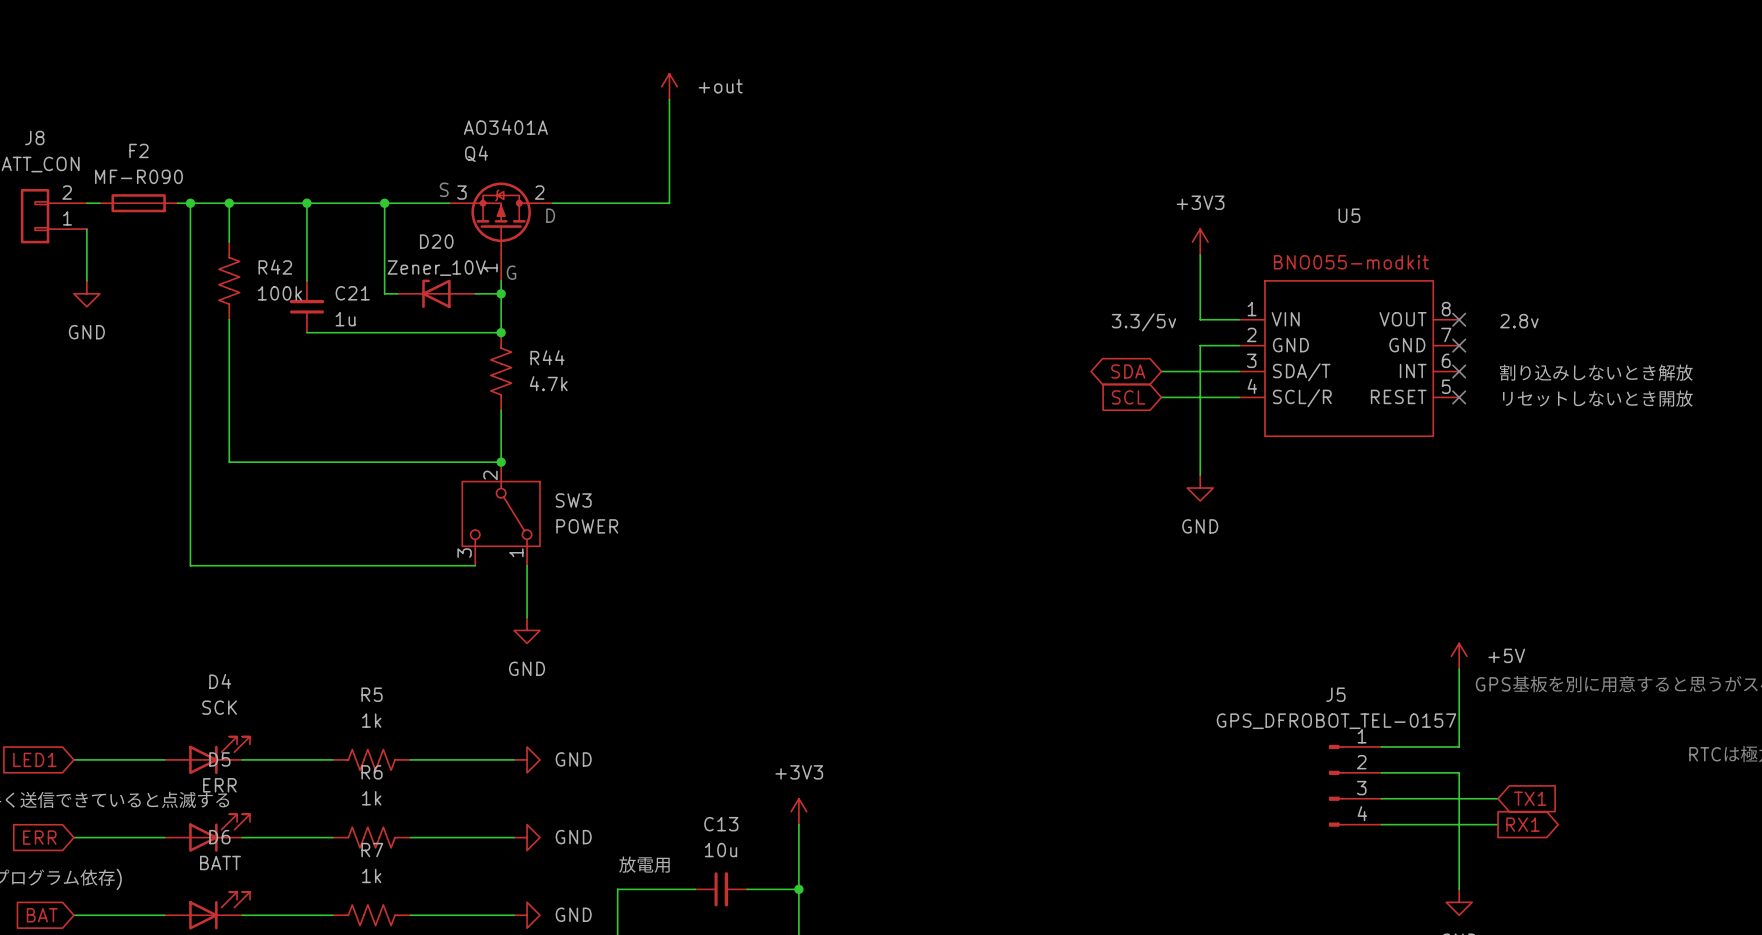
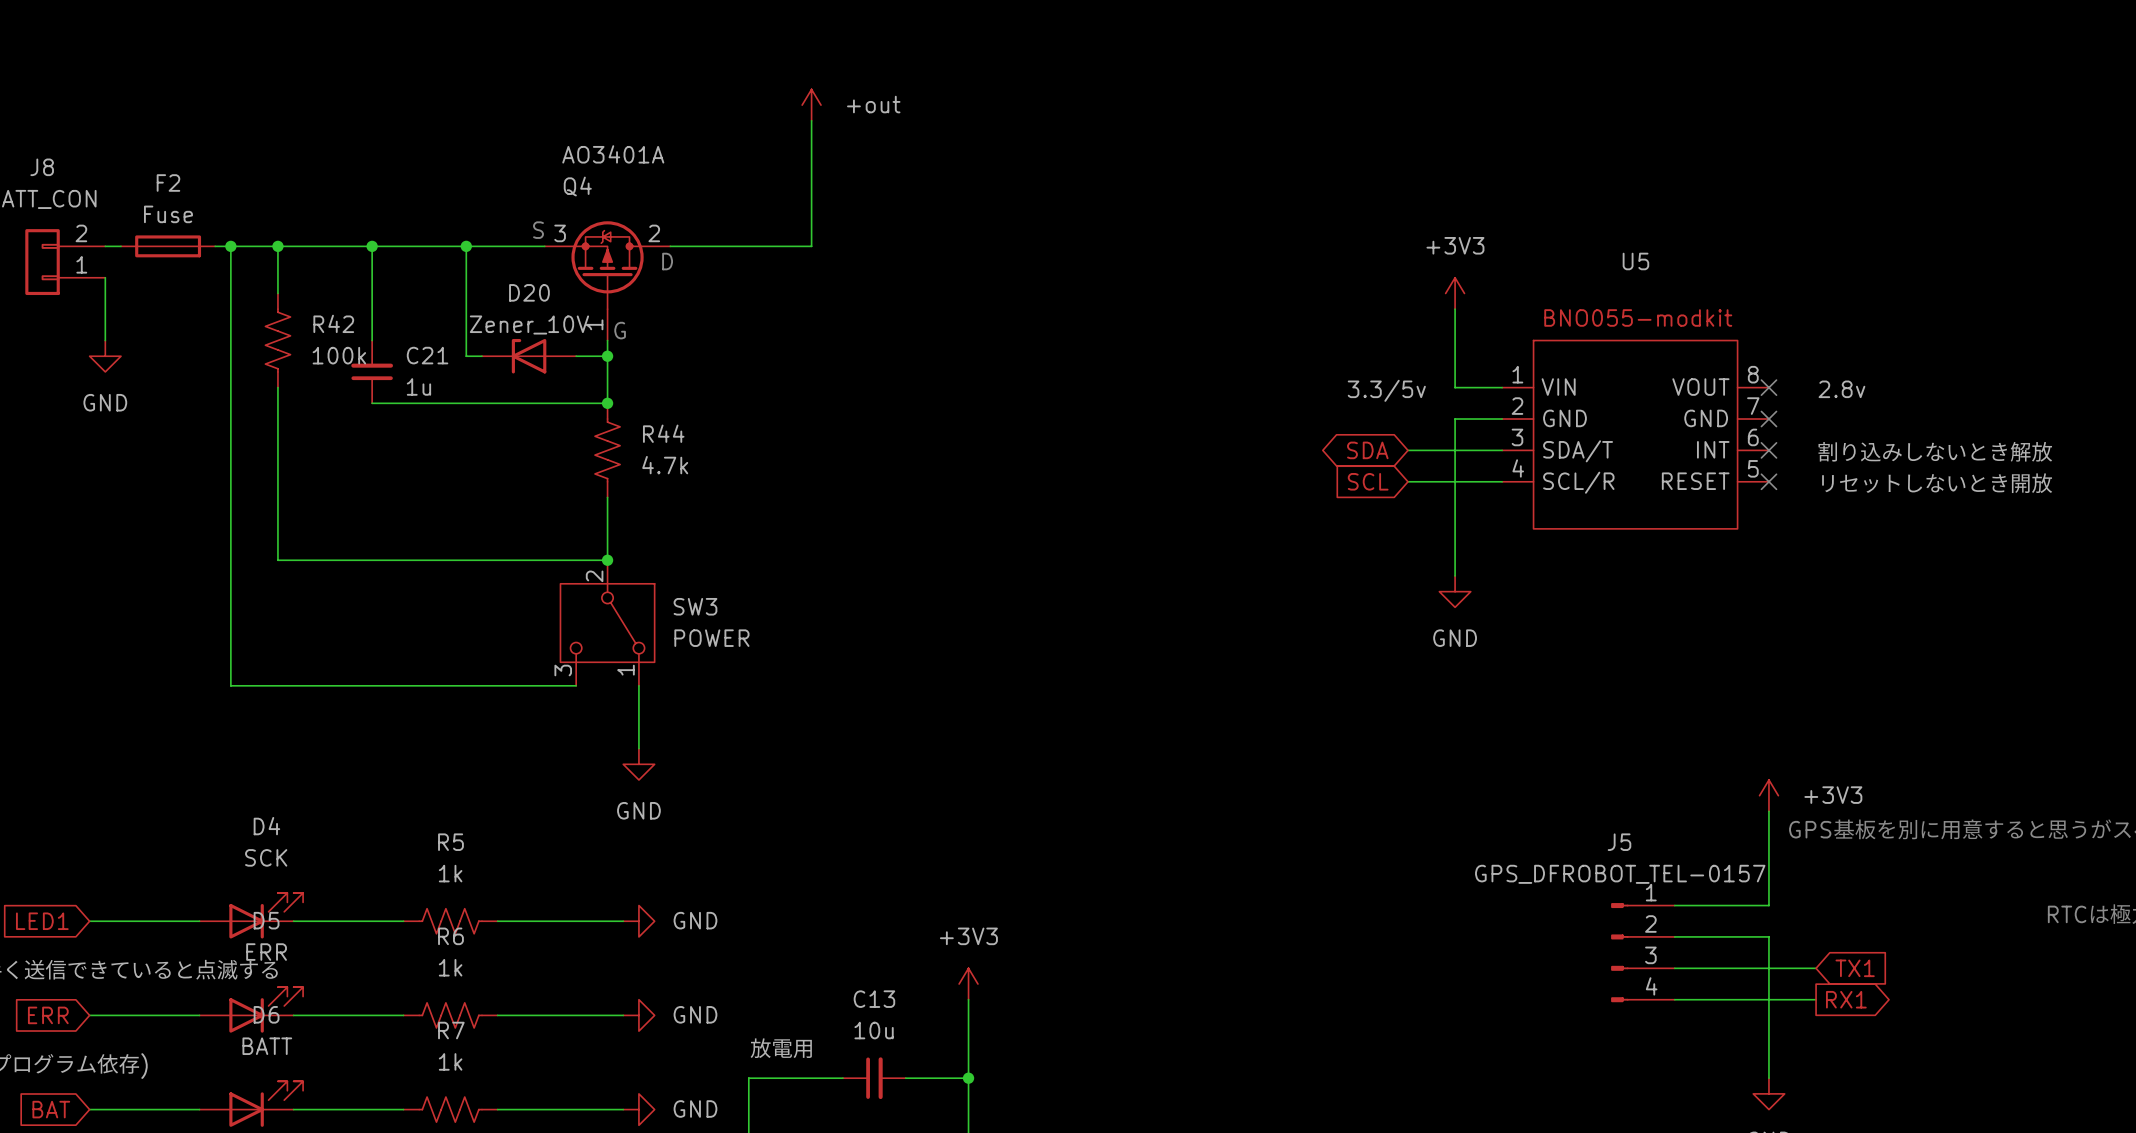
F2 value: MF-R090 (138, 176) -> Fuse (168, 214)
power symbol: +5V (1459, 656) -> +3V3 (1768, 795)

